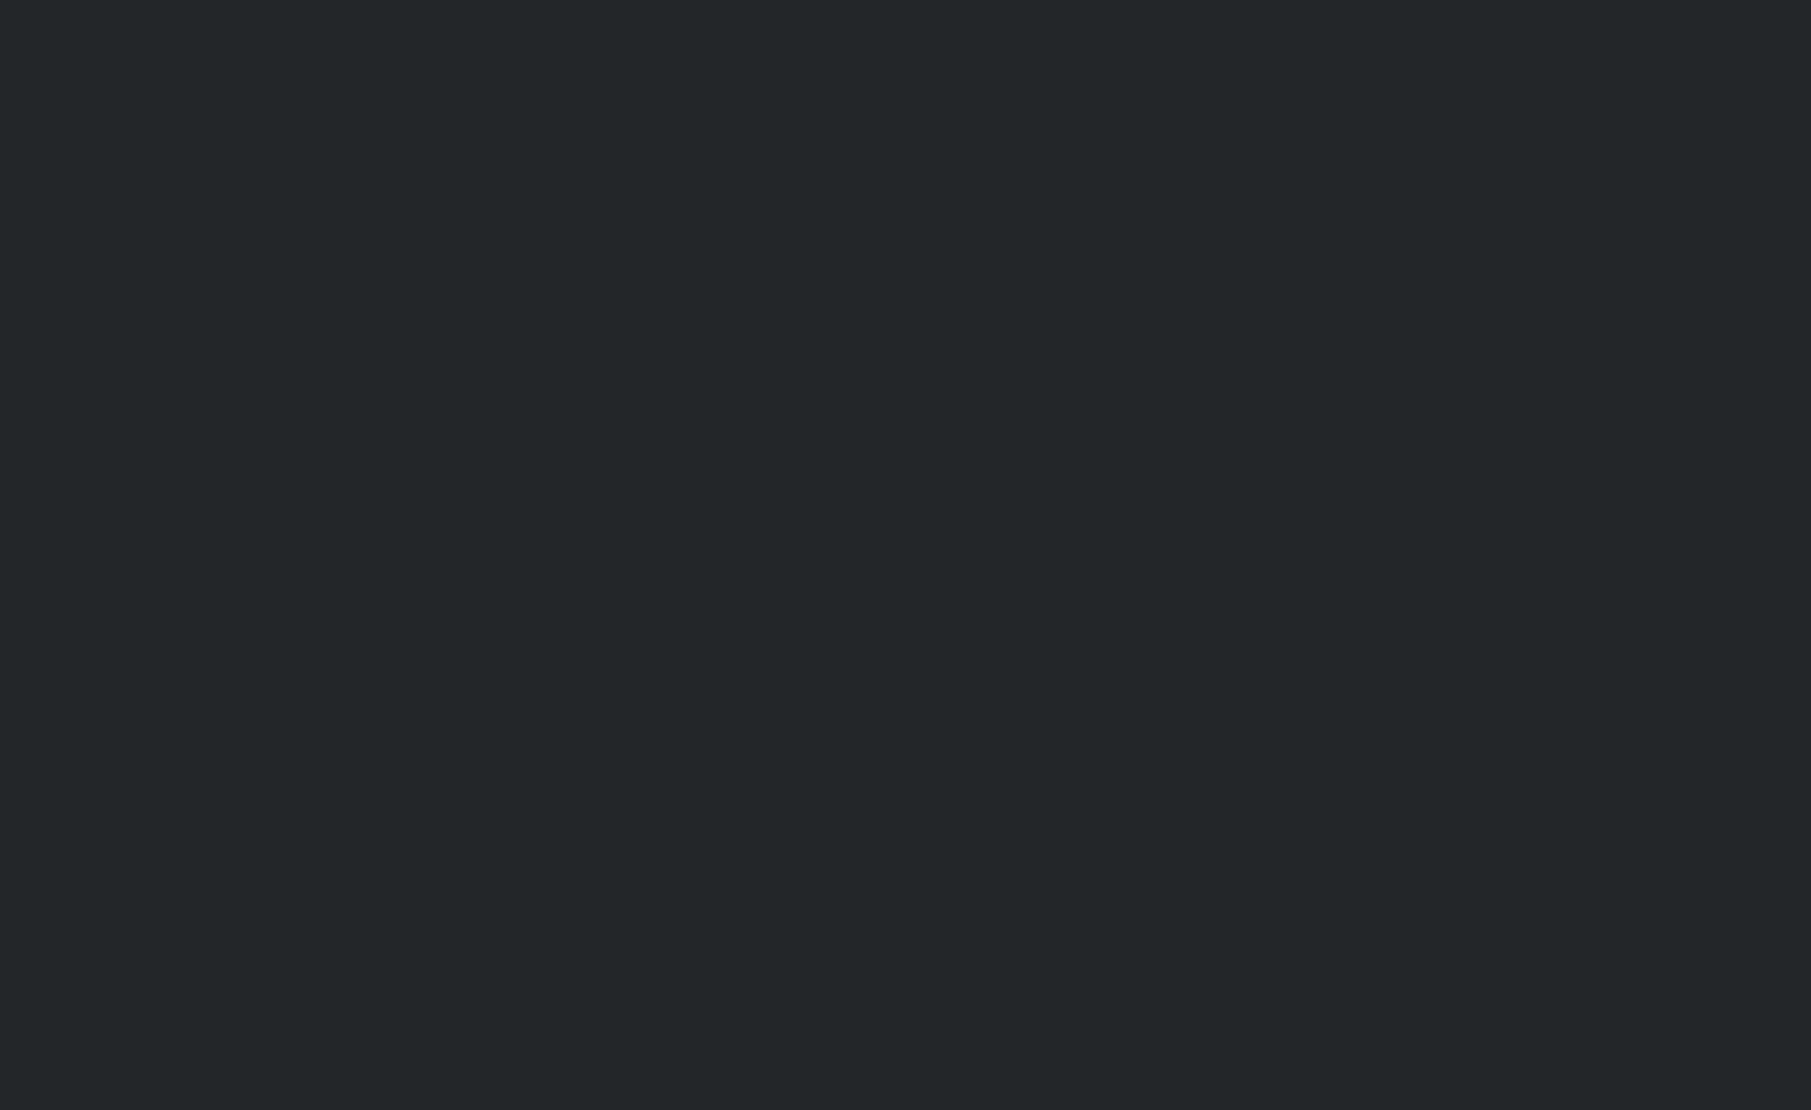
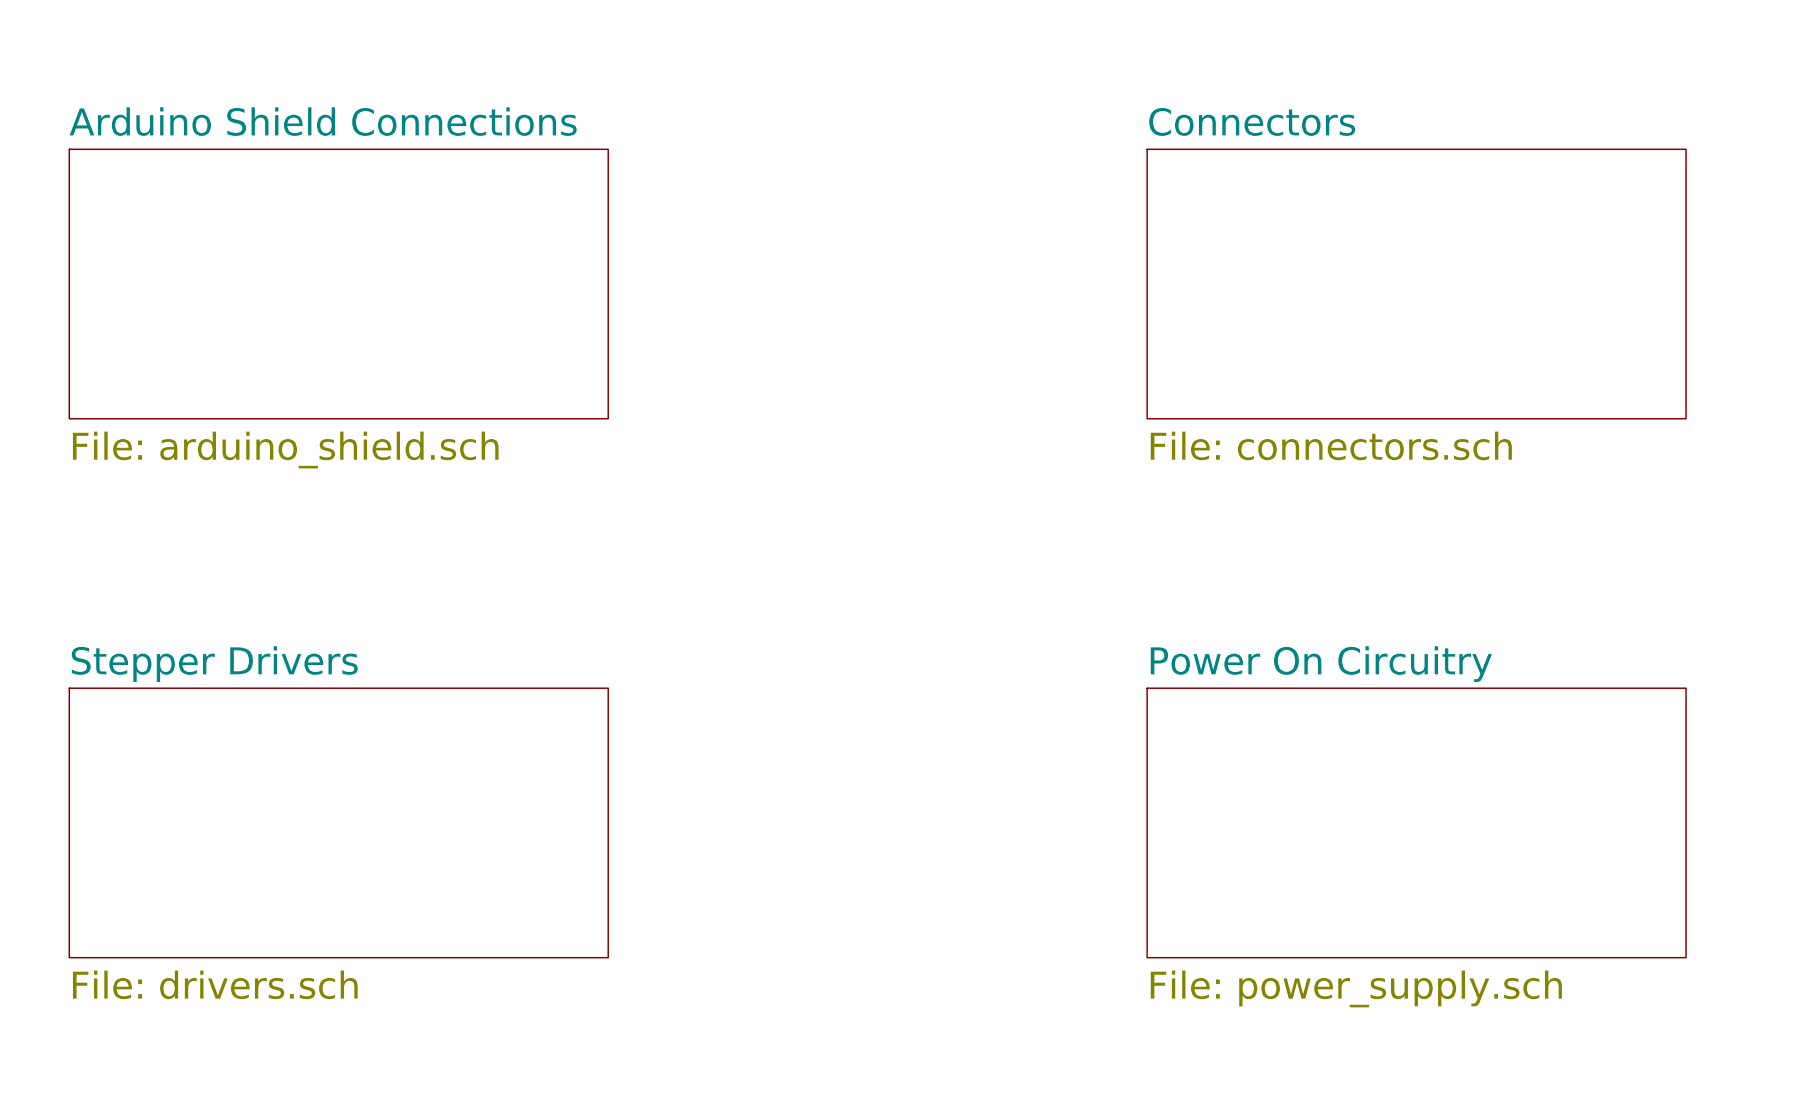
sheet Arduino Shield Connections: none -> File: arduino_shield.sch (338, 284)
sheet Connectors: none -> File: connectors.sch (1416, 284)
sheet Stepper Drivers: none -> File: drivers.sch (338, 822)
sheet Power On Circuitry: none -> File: power_supply.sch (1416, 822)

